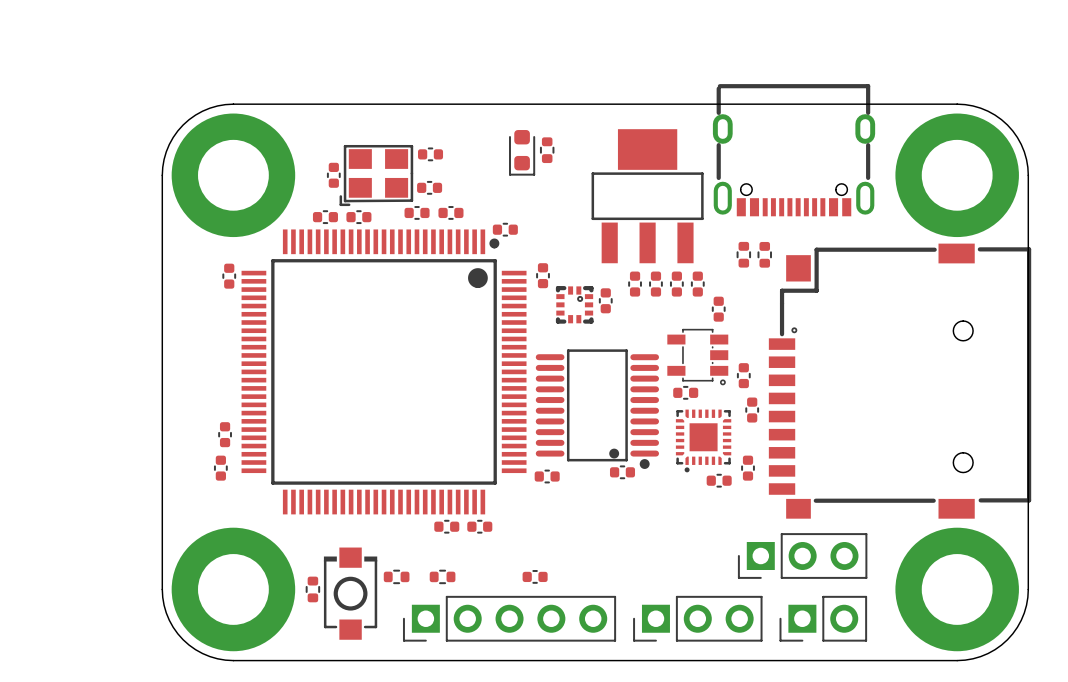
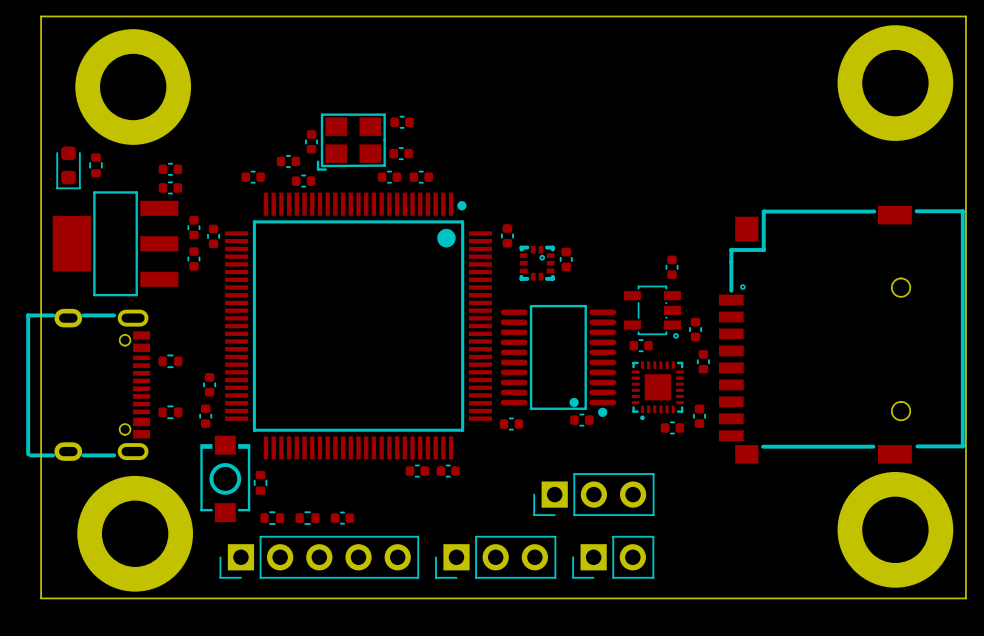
board edge: (233, 104) (957, 104) (980, 108) (995, 115) (1007, 125) (1017, 137) (1024, 151) (1028, 175) (1028, 589) (1024, 612) (1017, 627) (1007, 639) (988, 653) (973, 658) (957, 660) (233, 660) (209, 656) (195, 649) (183, 639) (173, 627) (166, 612) (162, 597) (162, 167) (169, 144) (183, 125) (195, 115) (209, 108) (233, 104) -> (41, 16) (41, 598) (965, 598) (965, 16) (41, 16)
part: (547, 150) -> none
part: (794, 150) -> none
part: (522, 152) -> none
part position: (233, 175) -> (133, 87)
part position: (957, 175) -> (895, 83)
part: none -> (288, 161)
part: (647, 196) -> none
part: none -> (95, 165)
part: none -> (68, 167)
part: none -> (170, 169)
part: none -> (253, 177)
part: (358, 217) -> none
part: none -> (170, 187)
part: (505, 229) -> none
part: (743, 254) -> none
part: (764, 254) -> none
part: none -> (193, 227)
part: none -> (115, 243)
part: (635, 284) -> none
part: (655, 284) -> none
part: (676, 284) -> none
part: (697, 284) -> none
part: none -> (193, 259)
part: none -> (170, 361)
part: none -> (88, 384)
part: none -> (170, 412)
part: none -> (260, 482)
part: none -> (593, 494)
part: (802, 555) -> none
part: none -> (272, 518)
part: none -> (307, 518)
part: (396, 576) -> none
part: (442, 576) -> none
part position: (535, 576) -> (342, 518)
part position: (233, 589) -> (135, 533)
part: (312, 589) -> none
part position: (350, 593) -> (225, 478)
part position: (509, 618) -> (319, 557)
part: none -> (495, 557)
part: (697, 618) -> none
part position: (823, 618) -> (613, 557)

